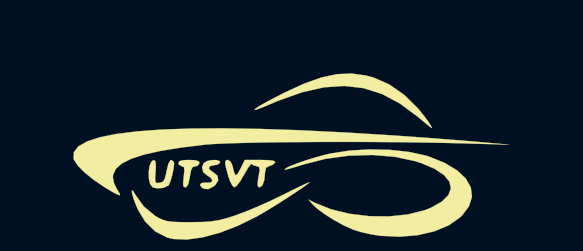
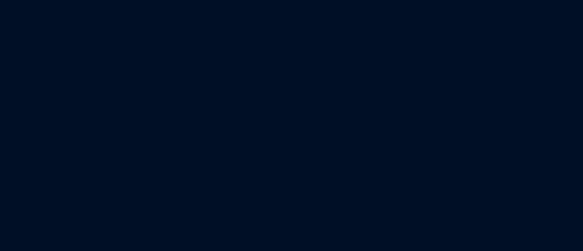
drawing: [73, 73, 510, 240] -> none

